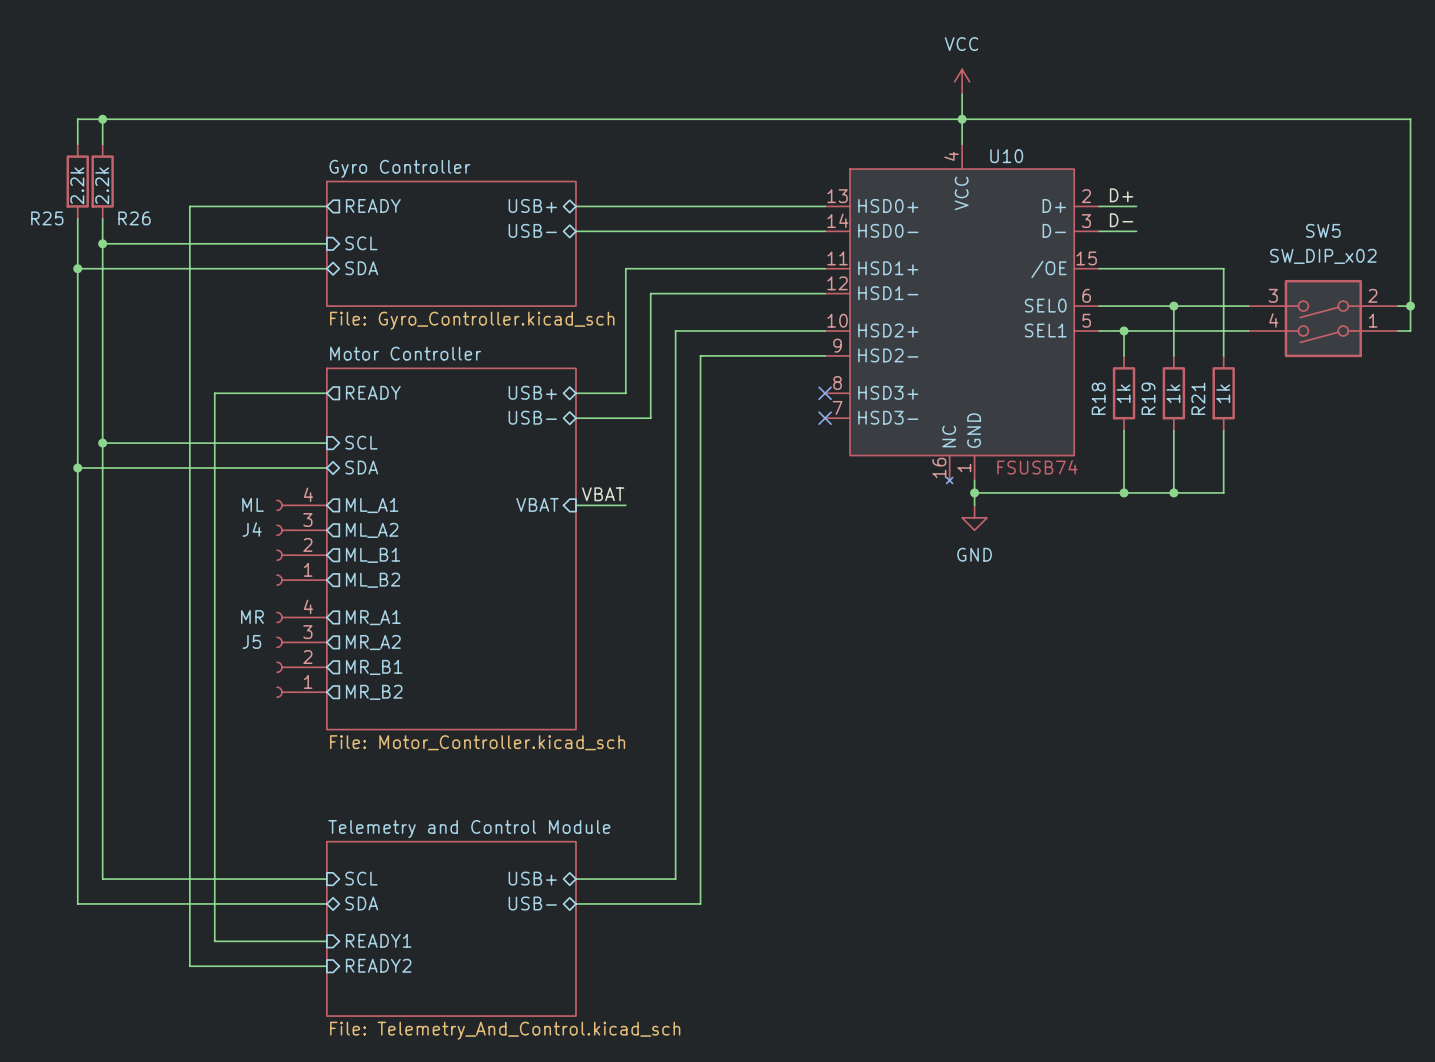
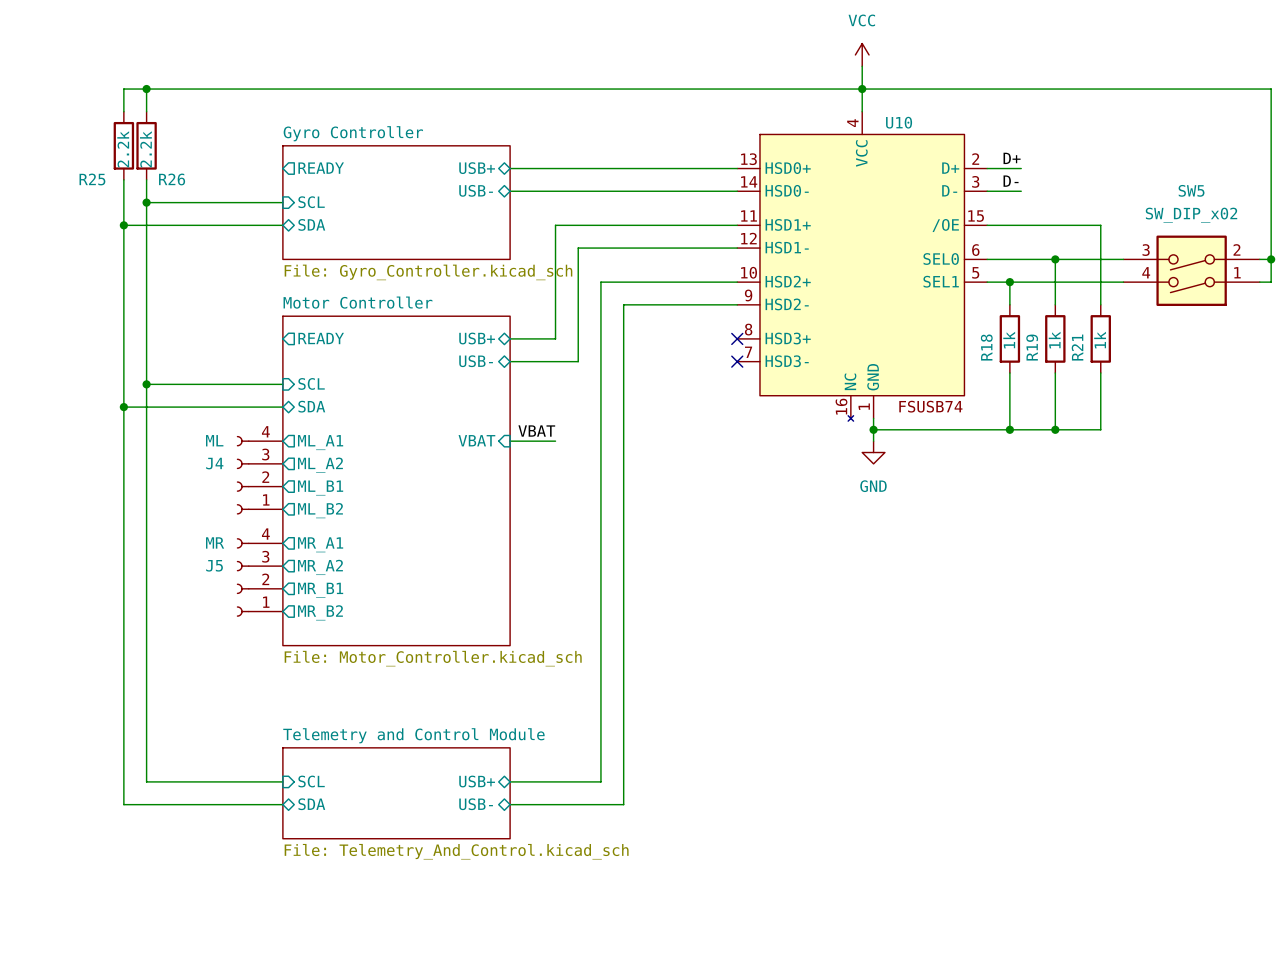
wire: (102, 119) (102, 144) -> (146, 89) (146, 111)
junction: (102, 119) -> none
wire: (152, 119) (77, 119) (77, 144) -> (123, 89) (123, 111)
junction: none -> (146, 89)
R25 position: (77, 181) -> (123, 145)
R26 position: (102, 181) -> (146, 145)
wire: (326, 206) (189, 206) (189, 966) (326, 966) -> none
wire: (77, 218) (77, 903) (152, 903) -> (123, 179) (123, 804)
wire: (102, 218) (102, 879) (177, 879) -> (146, 179) (146, 781)
wire: (102, 243) (177, 243) -> none
junction: (102, 243) -> none
junction: none -> (146, 202)
wire: (77, 268) (152, 268) -> none
junction: (77, 268) -> none
junction: none -> (123, 225)
wire: (326, 393) (214, 393) (214, 941) (326, 941) -> none
wire: (102, 443) (177, 443) -> none
junction: (102, 443) -> none
junction: none -> (146, 384)
wire: (77, 468) (152, 468) -> none
junction: (77, 468) -> none
junction: none -> (123, 407)
sheet Telemetry and Control Module: none -> File: Telemetry_And_Control.kicad_sch (396, 793)
sheet Telemetry and Control Module: File: Telemetry_And_Control.kicad_sch (451, 928) -> none
sheet pin: READY1 (378, 940) -> none
sheet pin: READY2 (378, 965) -> none

